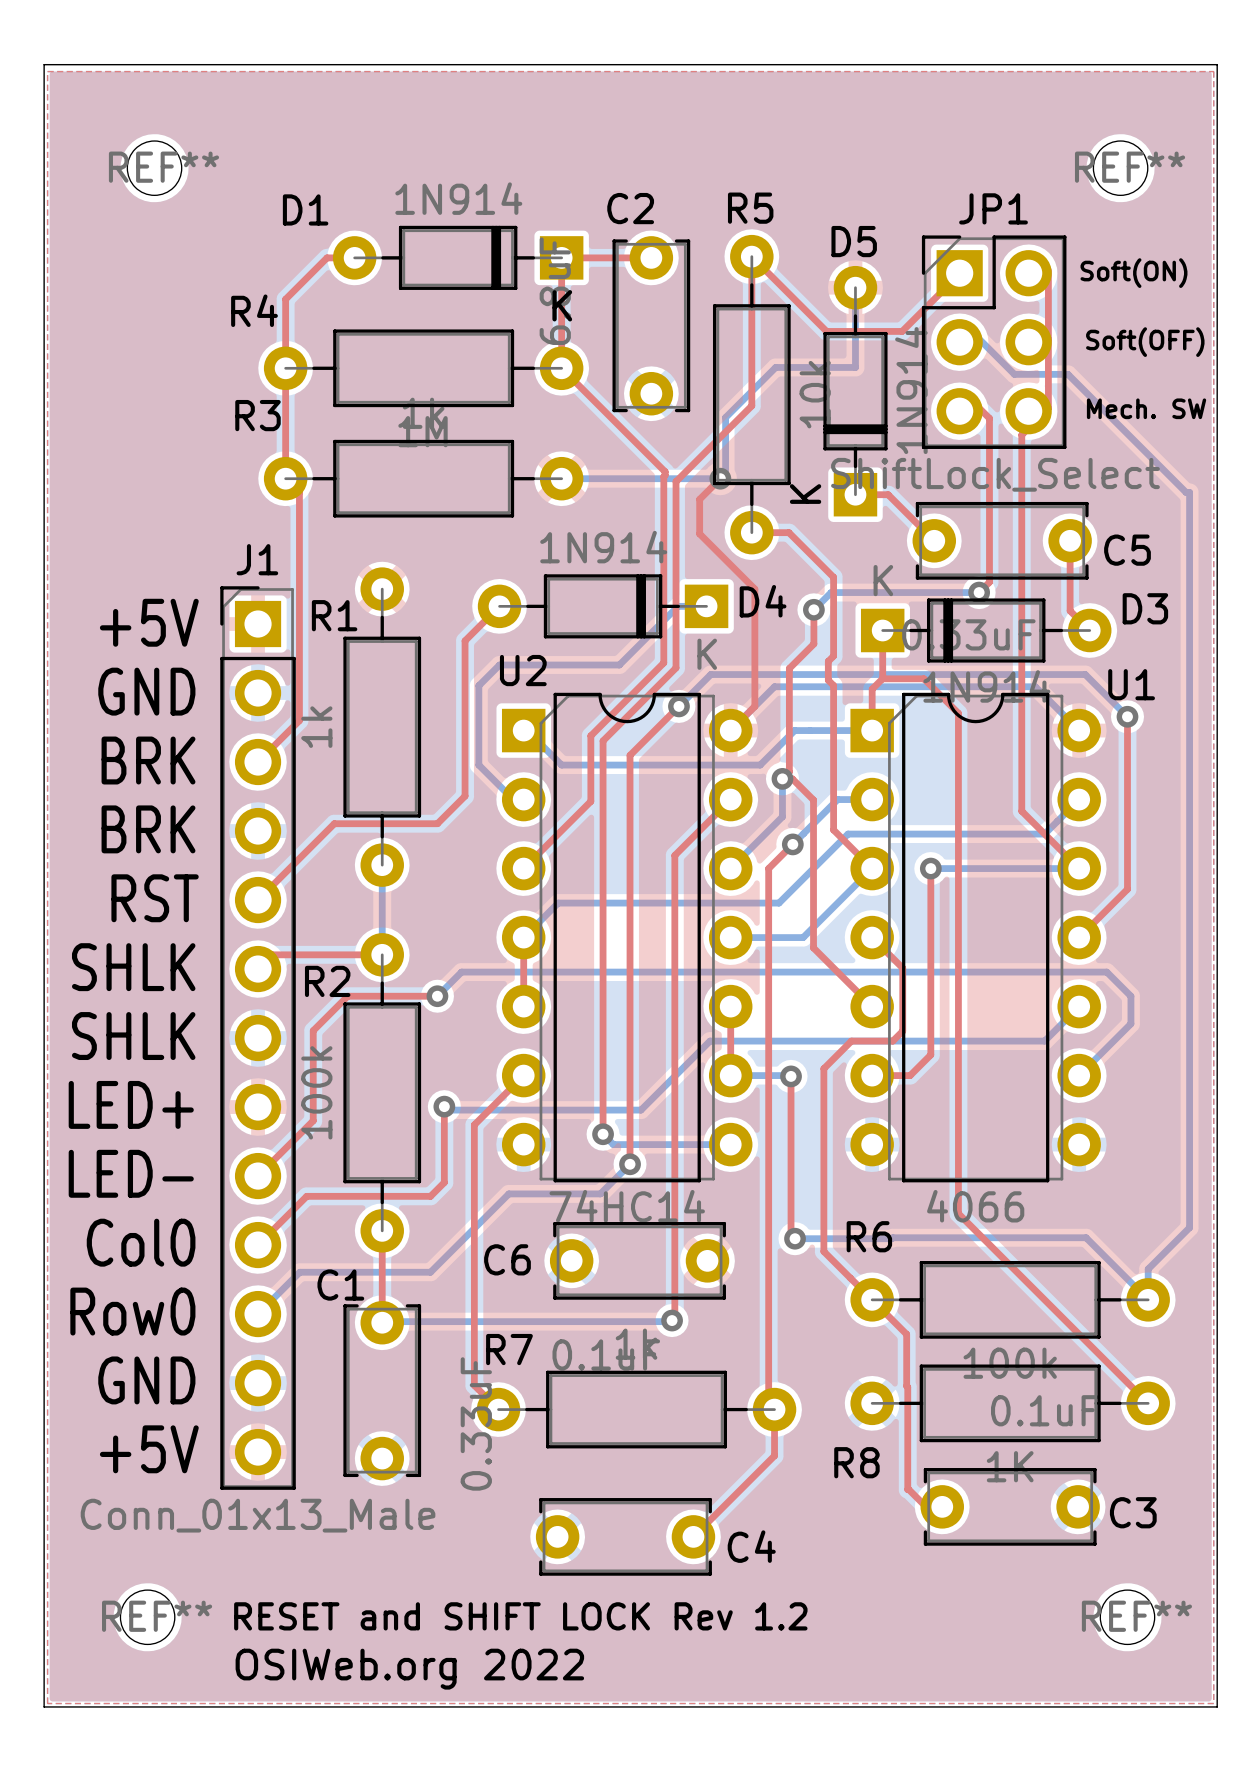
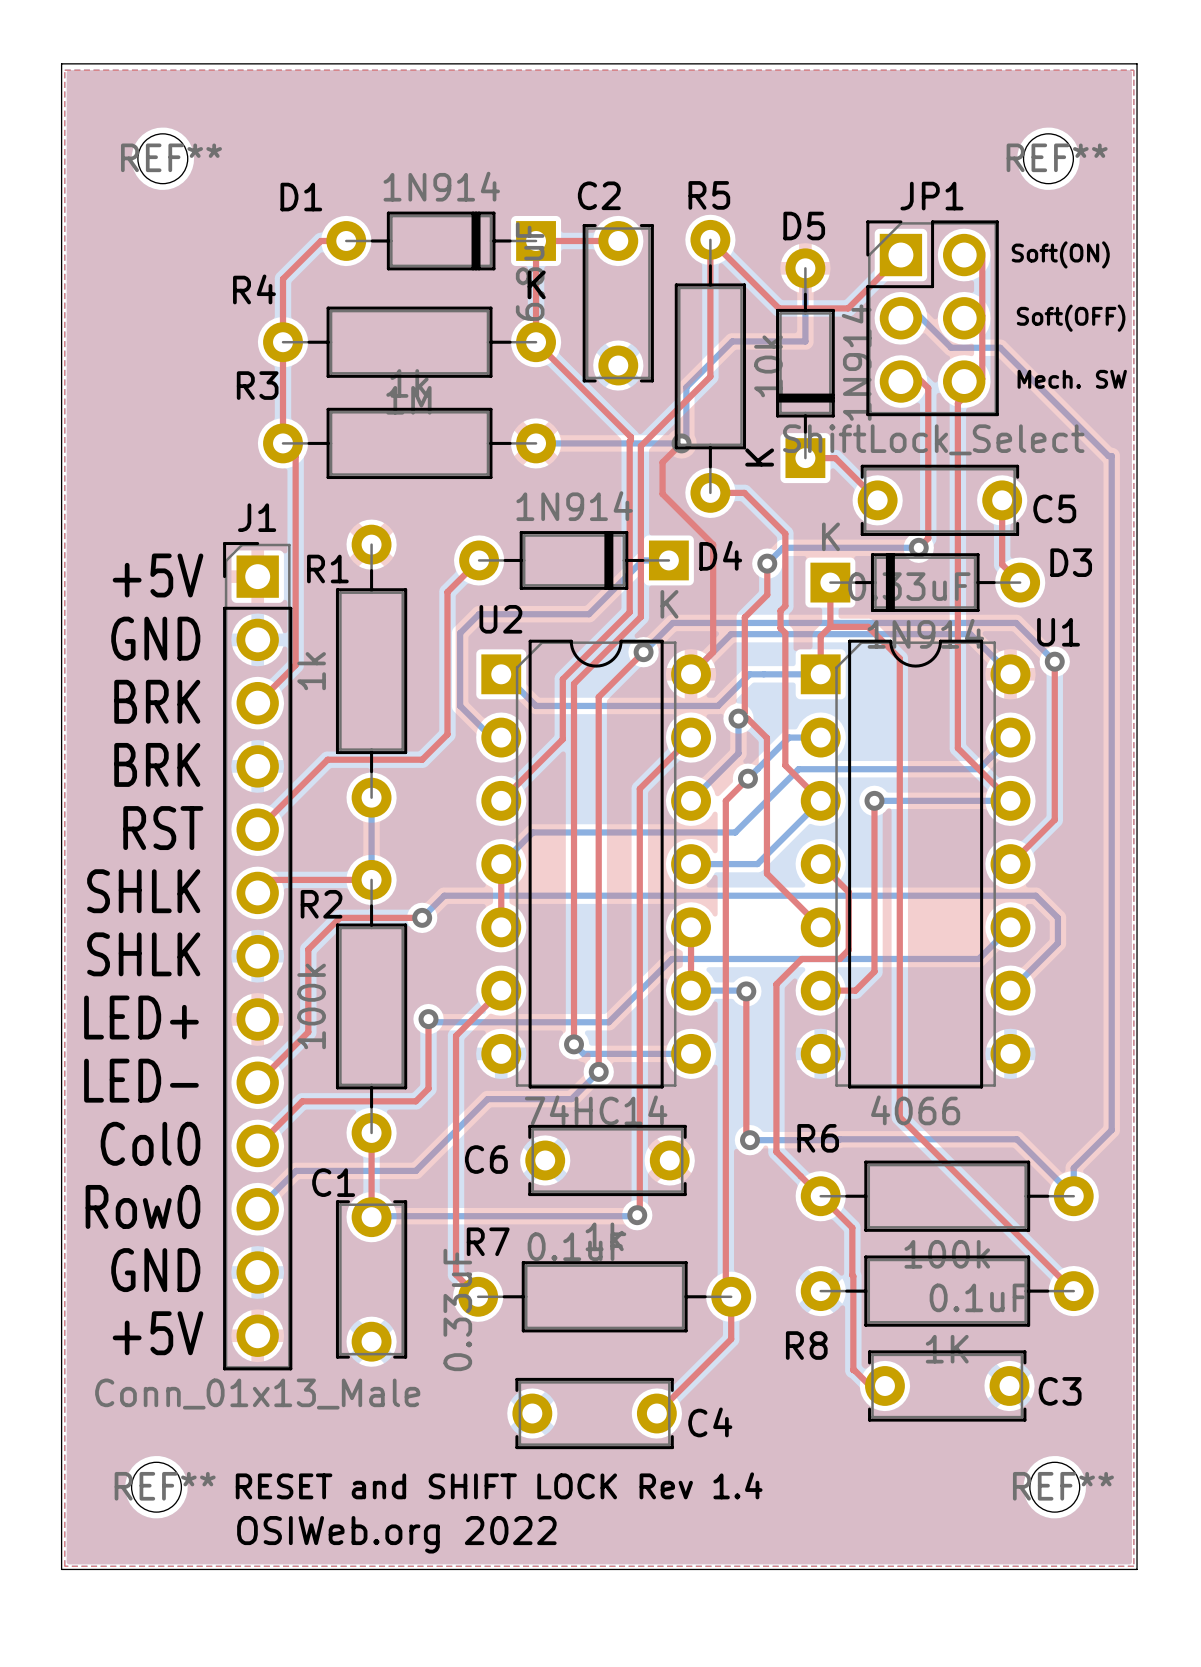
text: RESET and SHIFT LOCK Rev 1.2 (520, 1616) -> RESET and SHIFT LOCK Rev 1.4 (499, 1485)

